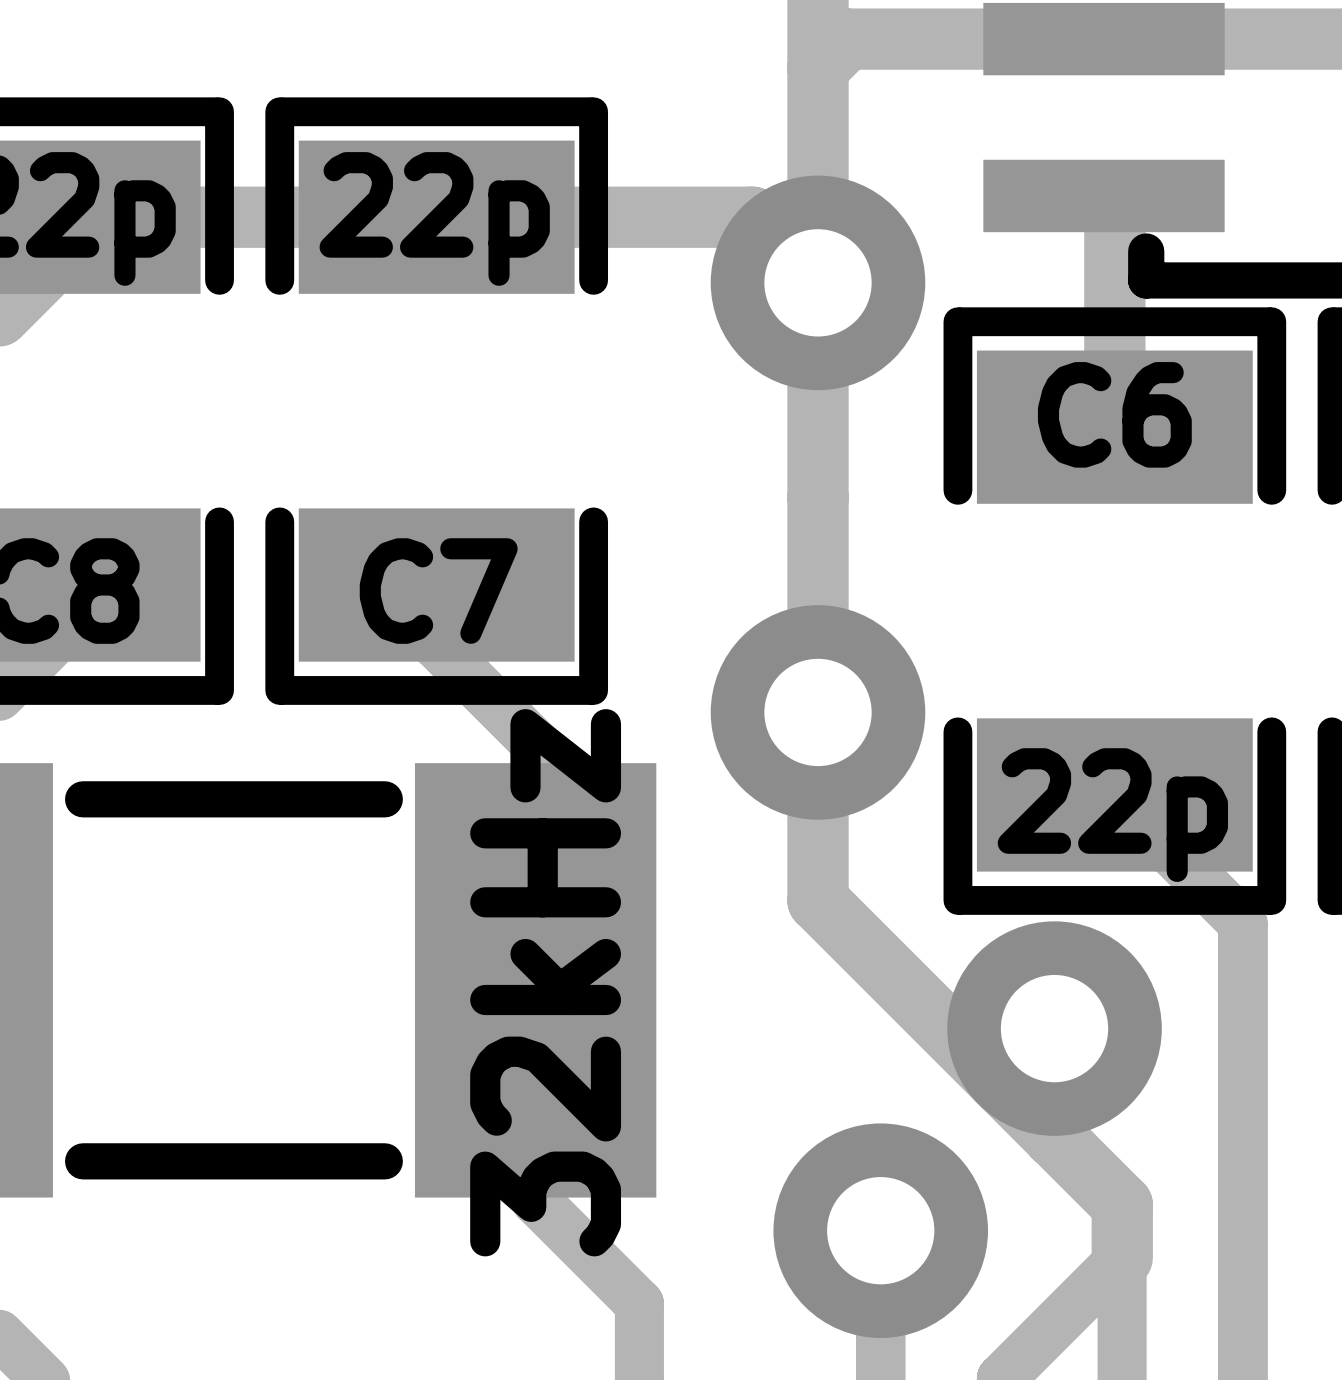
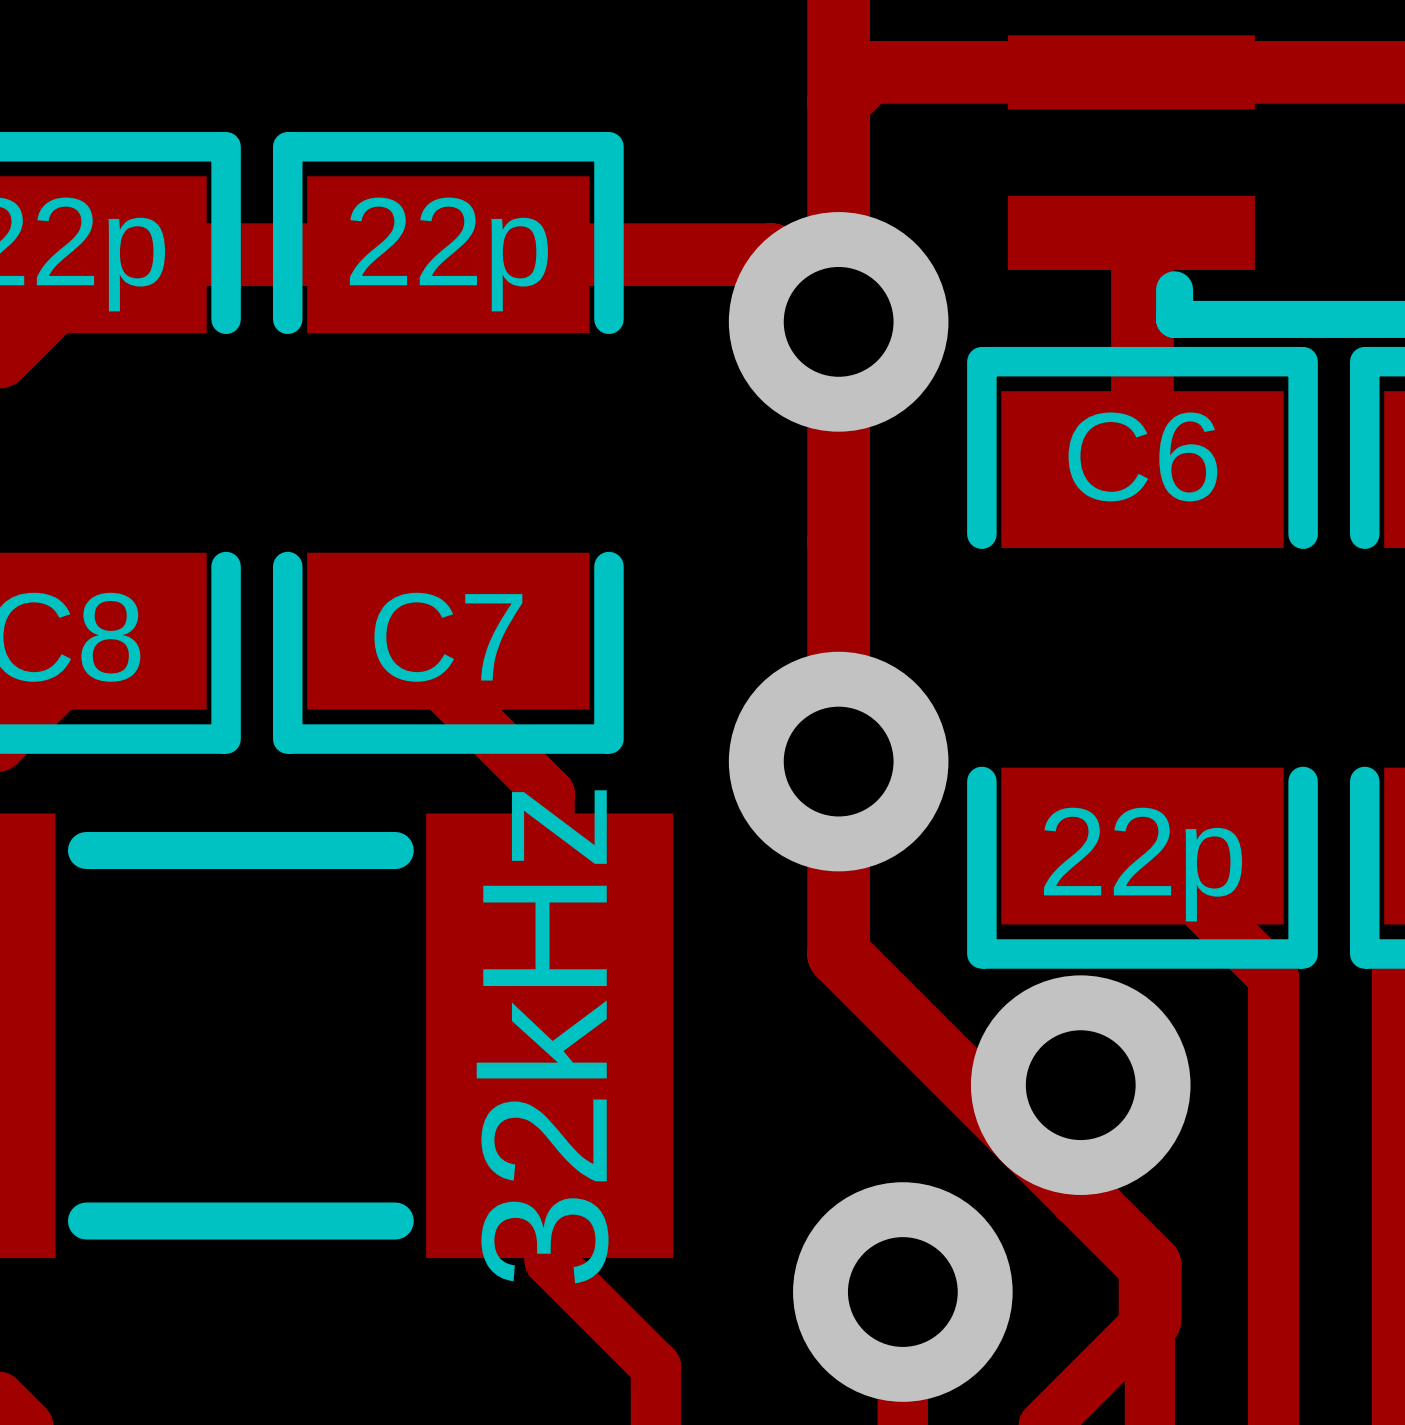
part value position: 32kHz (545, 982) -> 32kHz (542, 1036)

